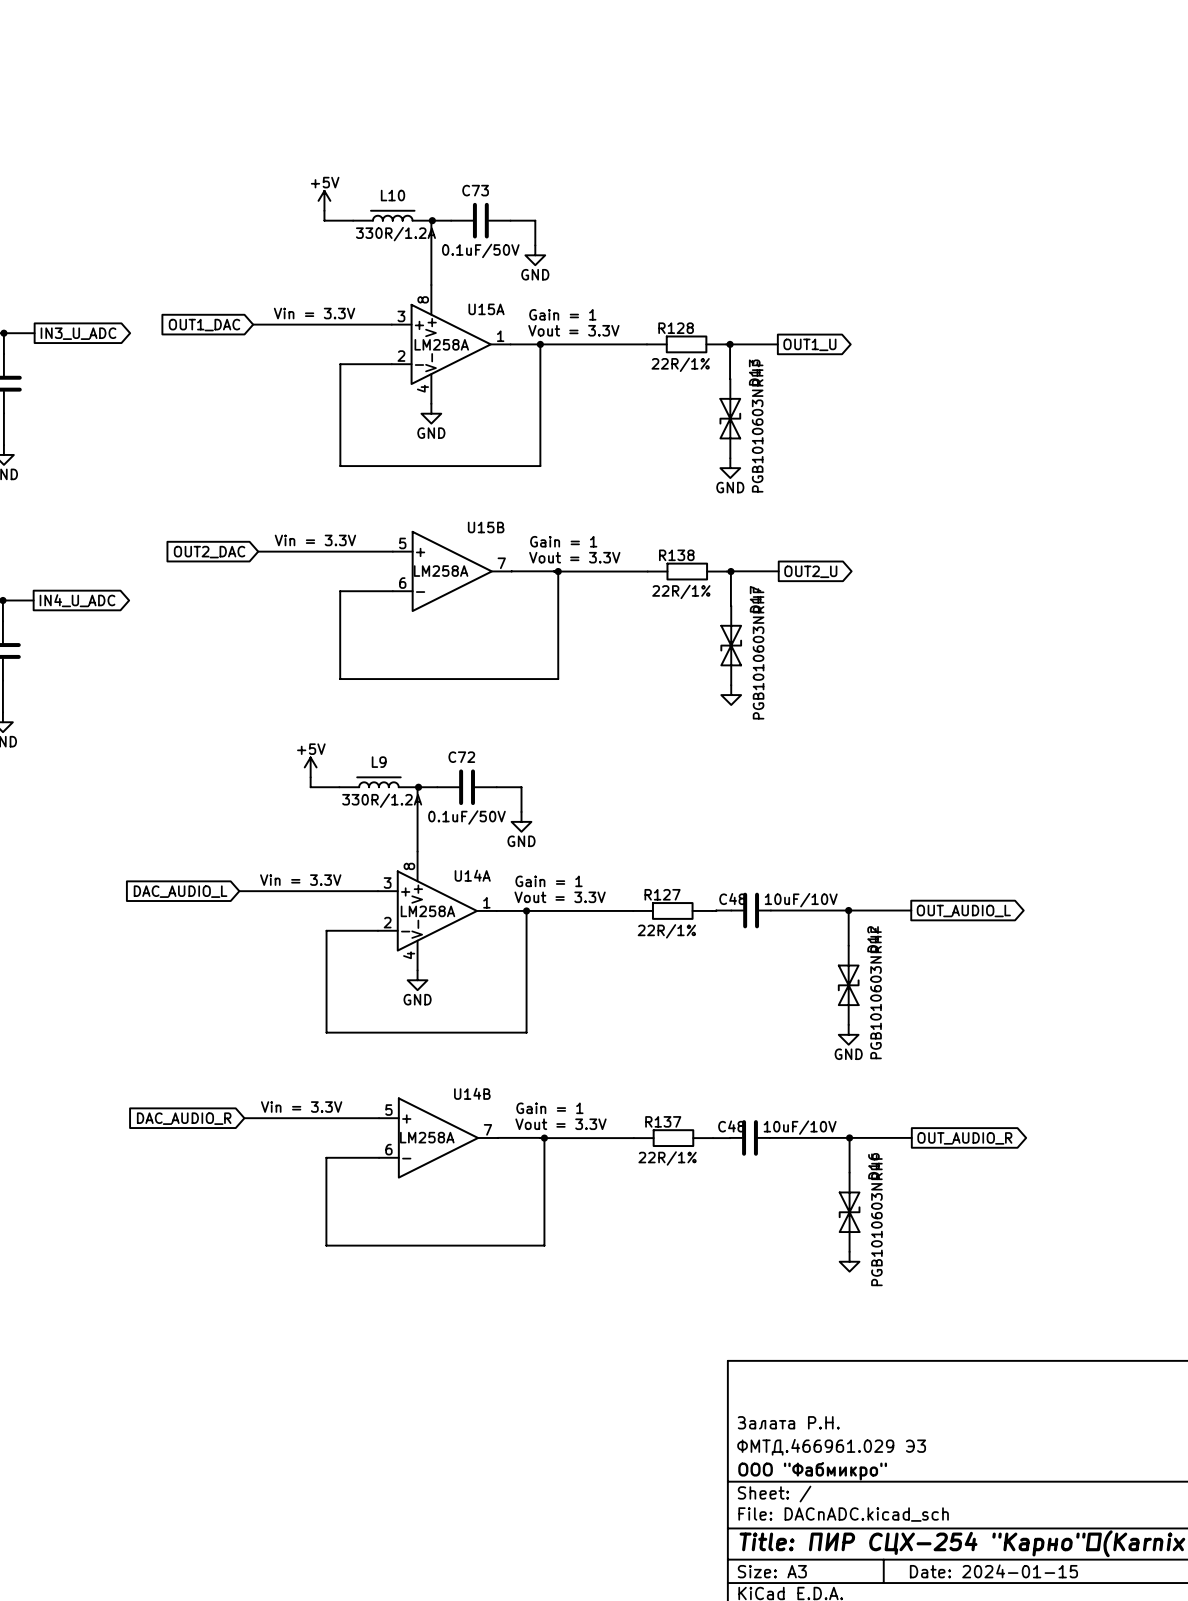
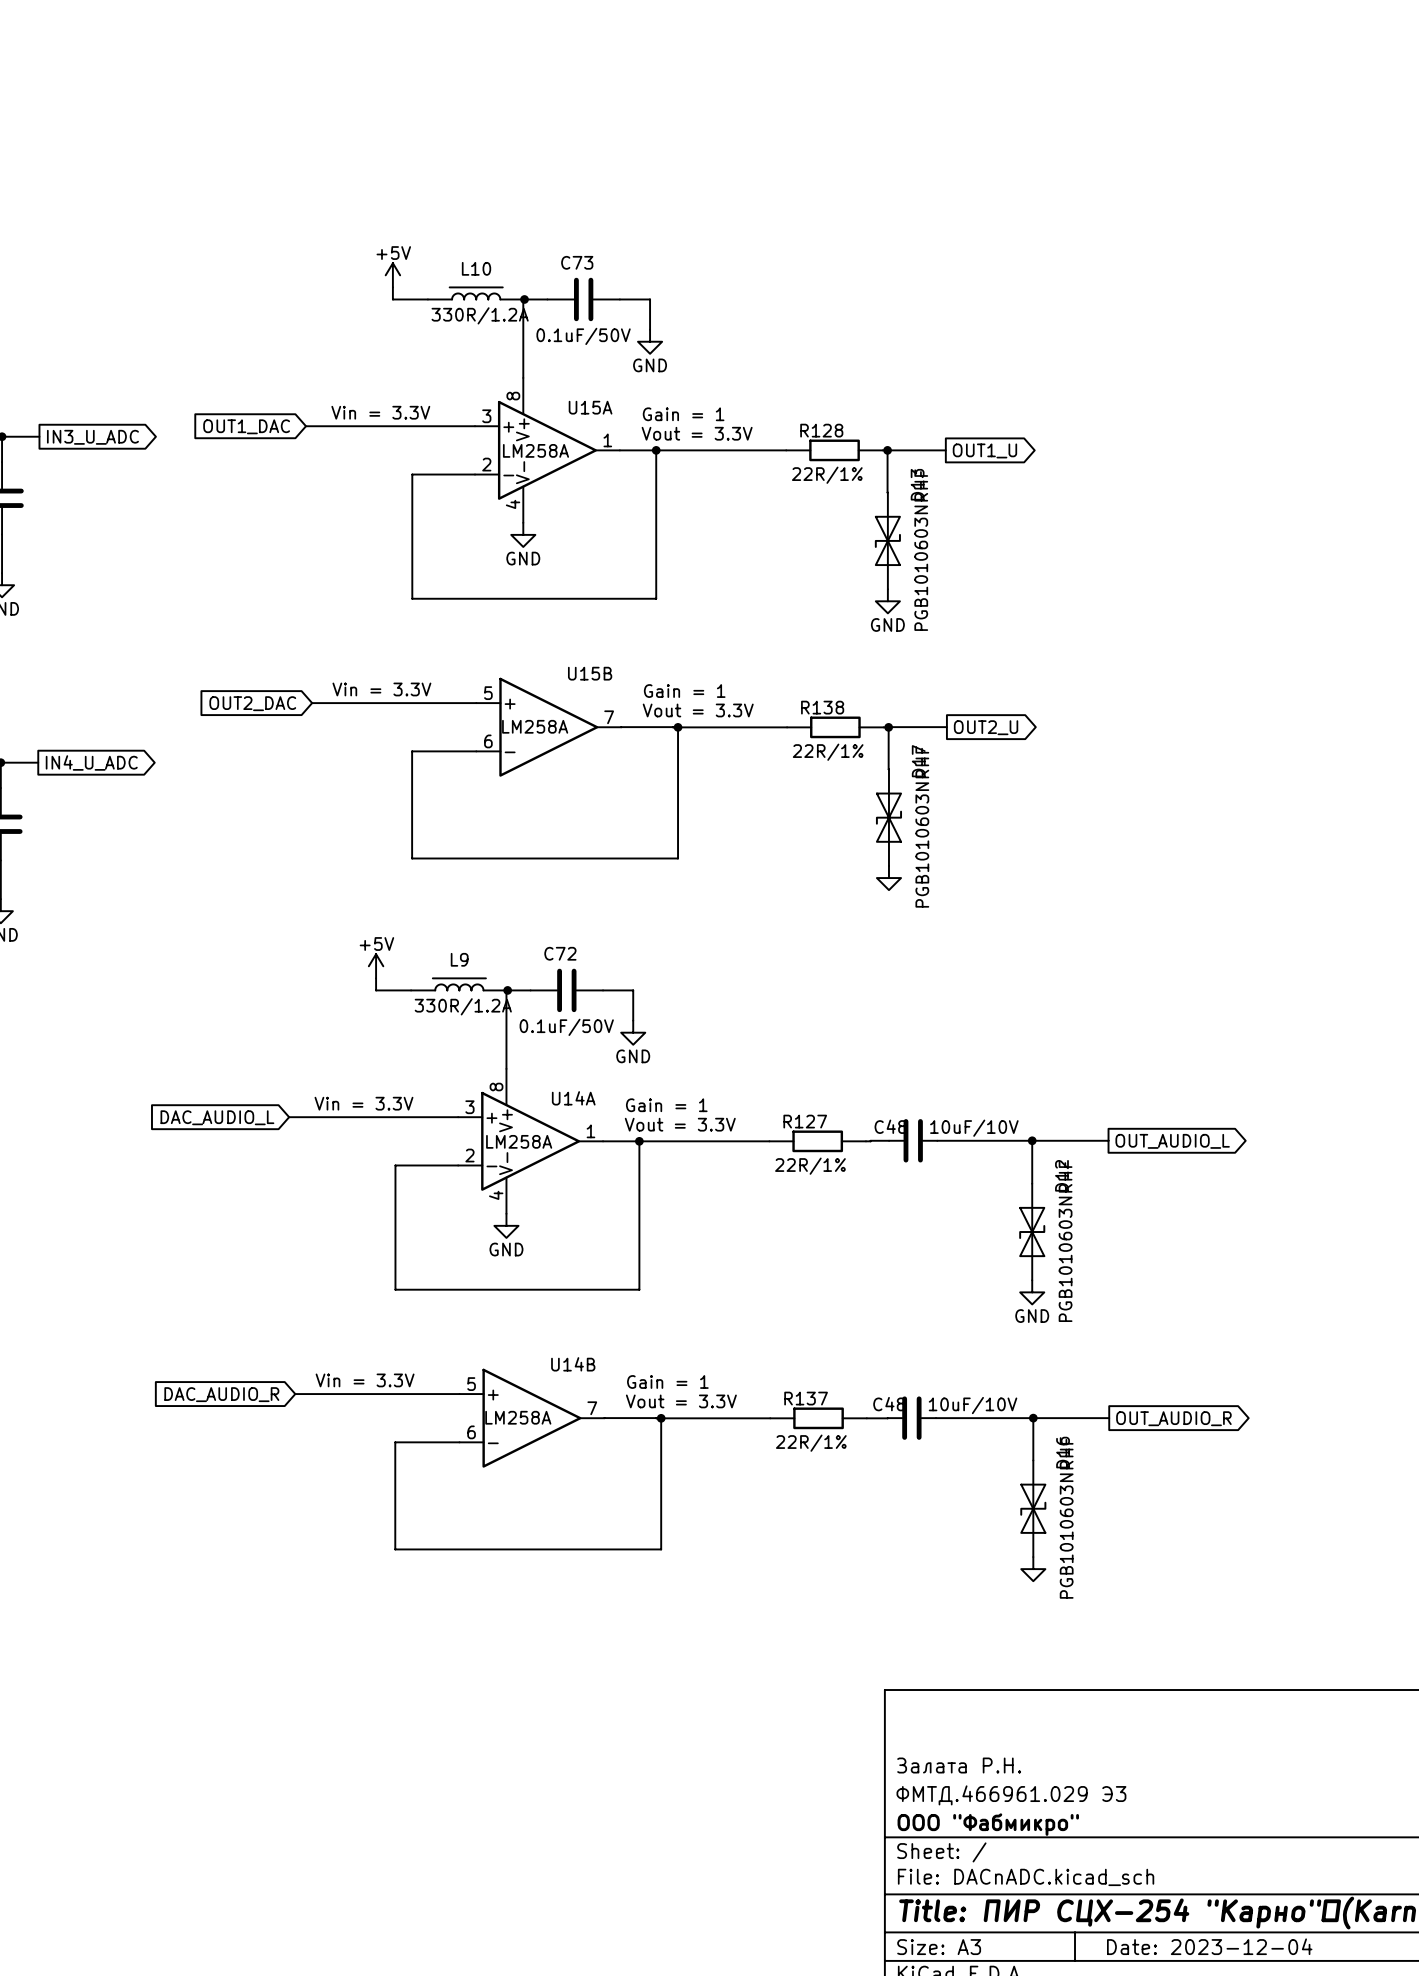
title block: Date: 2024-01-15 (993, 1571) -> Date: 2023-12-04 (1209, 1946)

